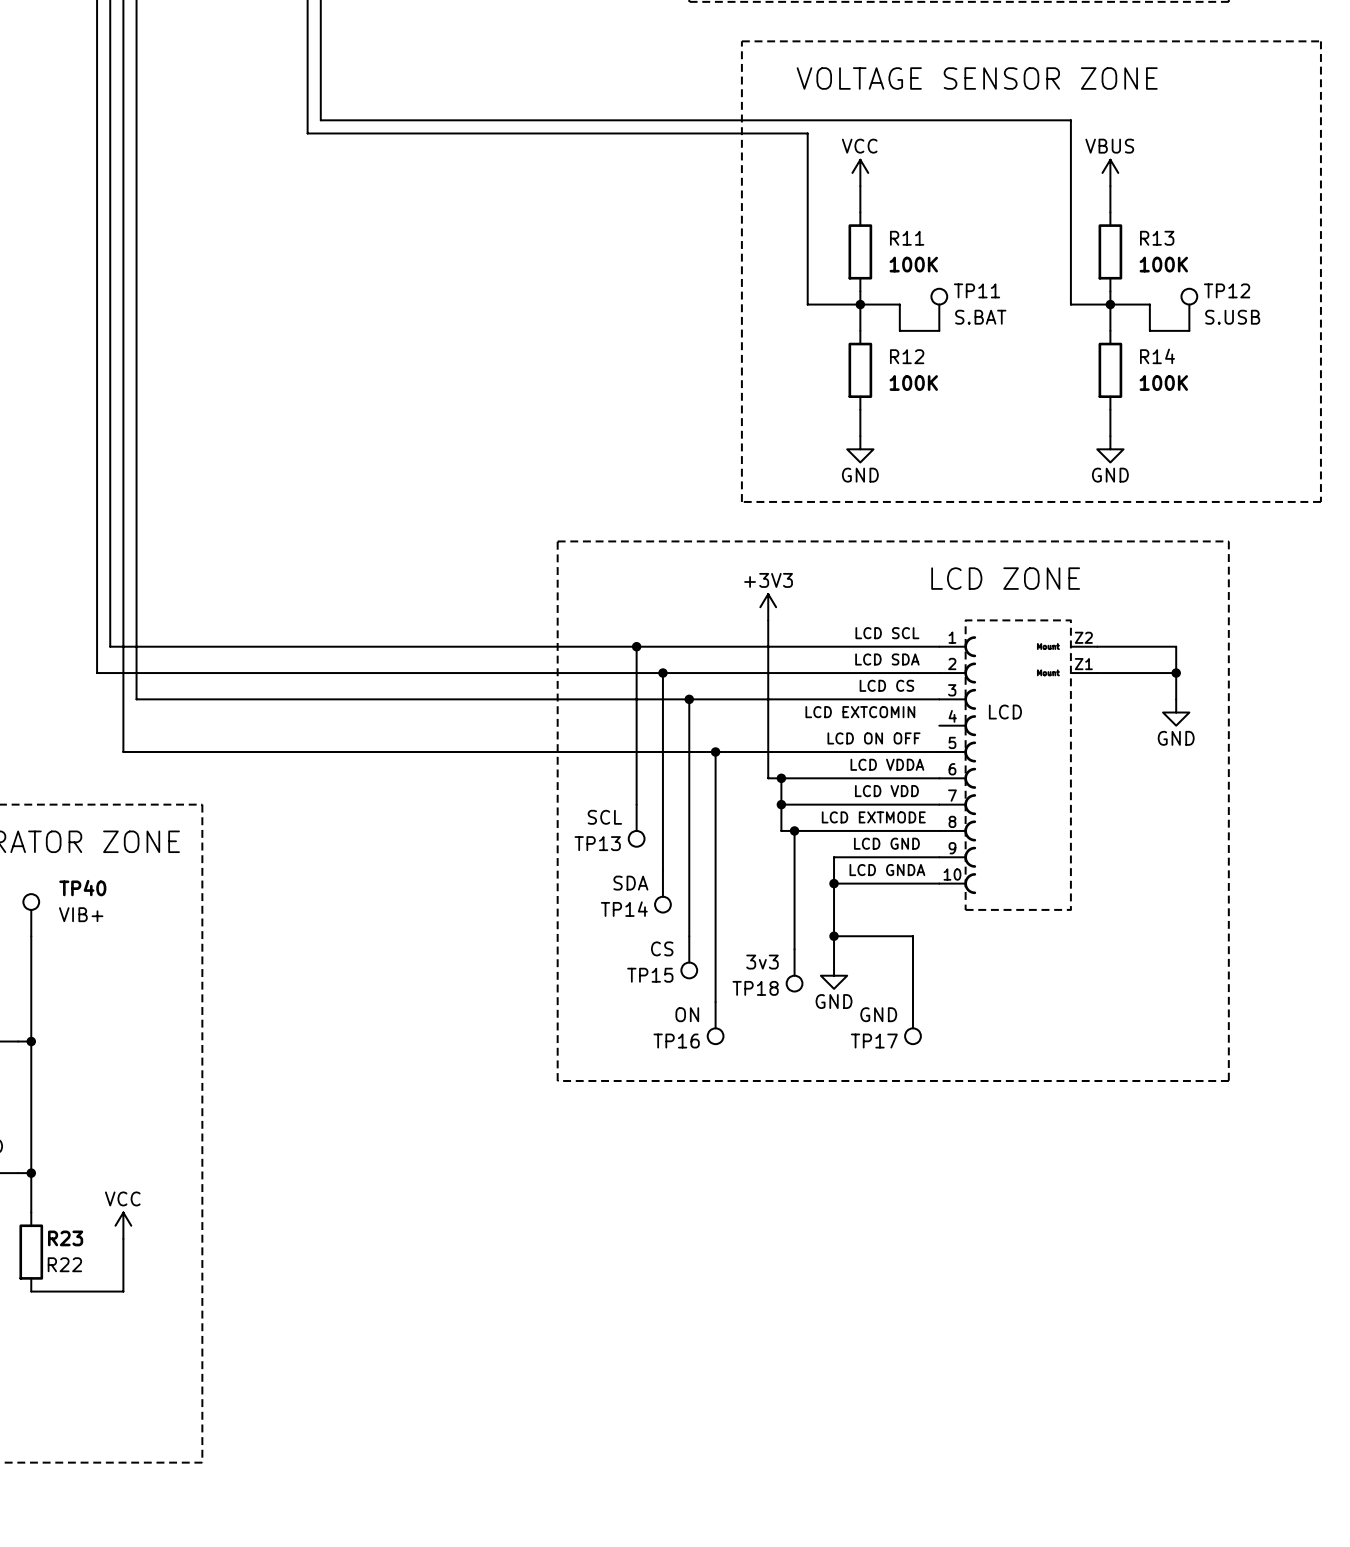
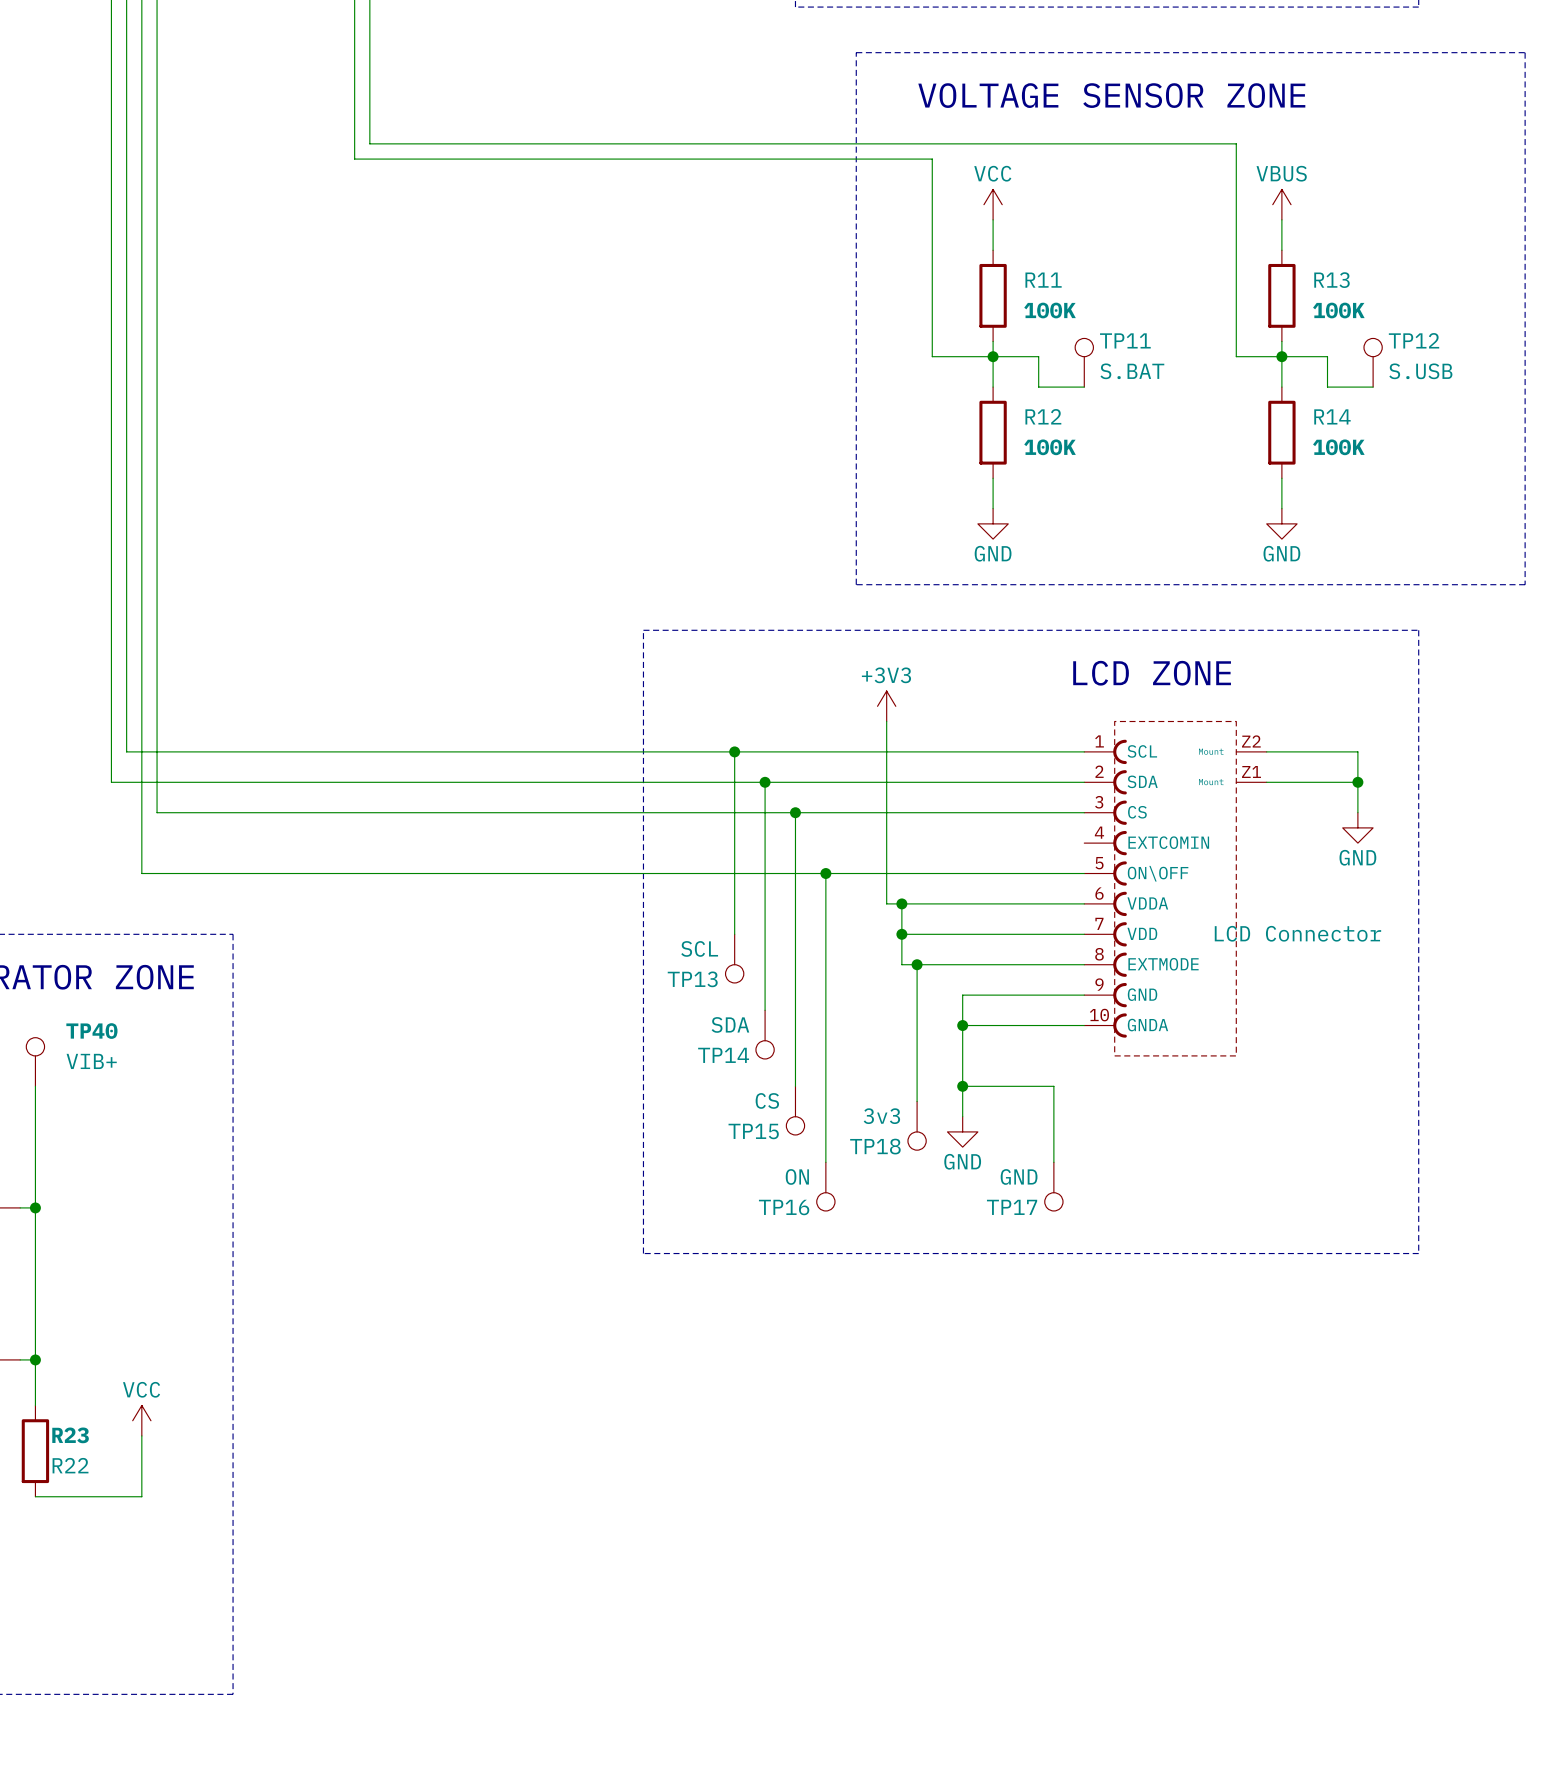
part symbol: [939, 620, 1098, 910] -> [1084, 721, 1267, 1056]
part text: LCD SCL (887, 633) -> none
part text: LCD SDA (887, 659) -> none
part text: LCD CS (886, 685) -> none
part text: LCD EXTCOMIN (860, 712) -> none
part text: LCD (1005, 712) -> LCD Connector (1297, 933)
part text: LCD ON OFF (874, 738) -> none
part text: LCD VDDA (887, 764) -> none
part text: LCD VDD (886, 791) -> none
part text: LCD EXTMODE (873, 817) -> none
part text: LCD GND (886, 843) -> none
part text: LCD GNDA (887, 870) -> none

